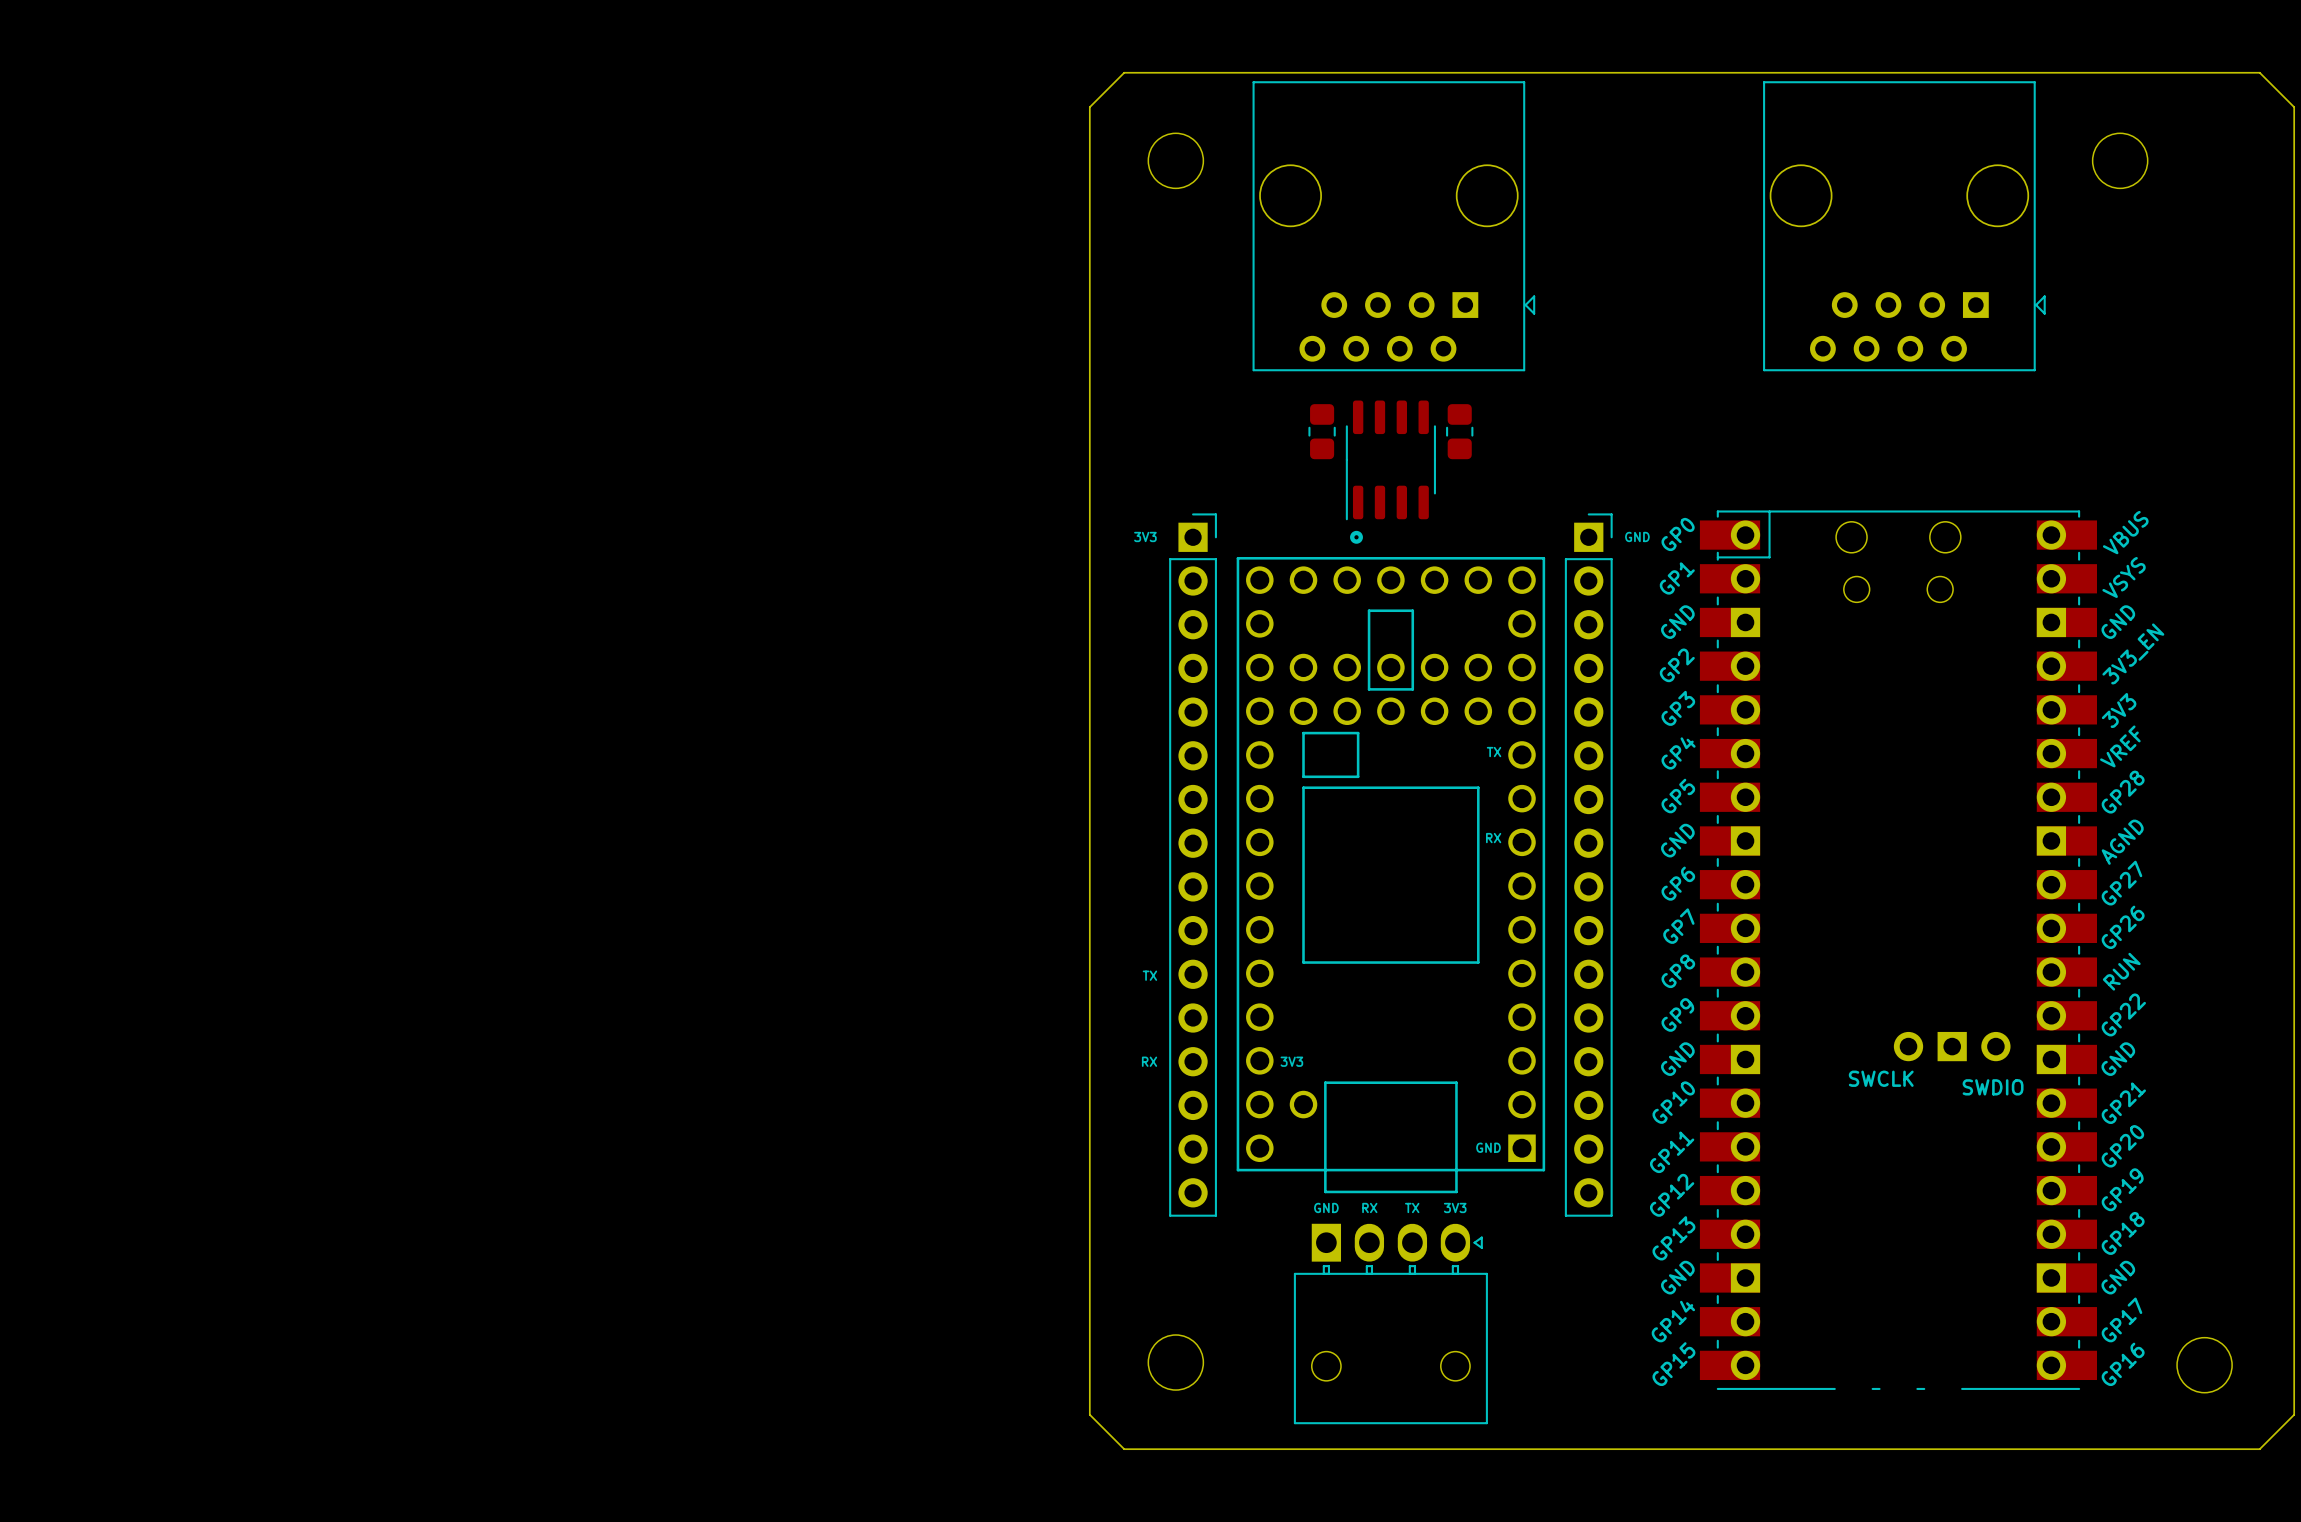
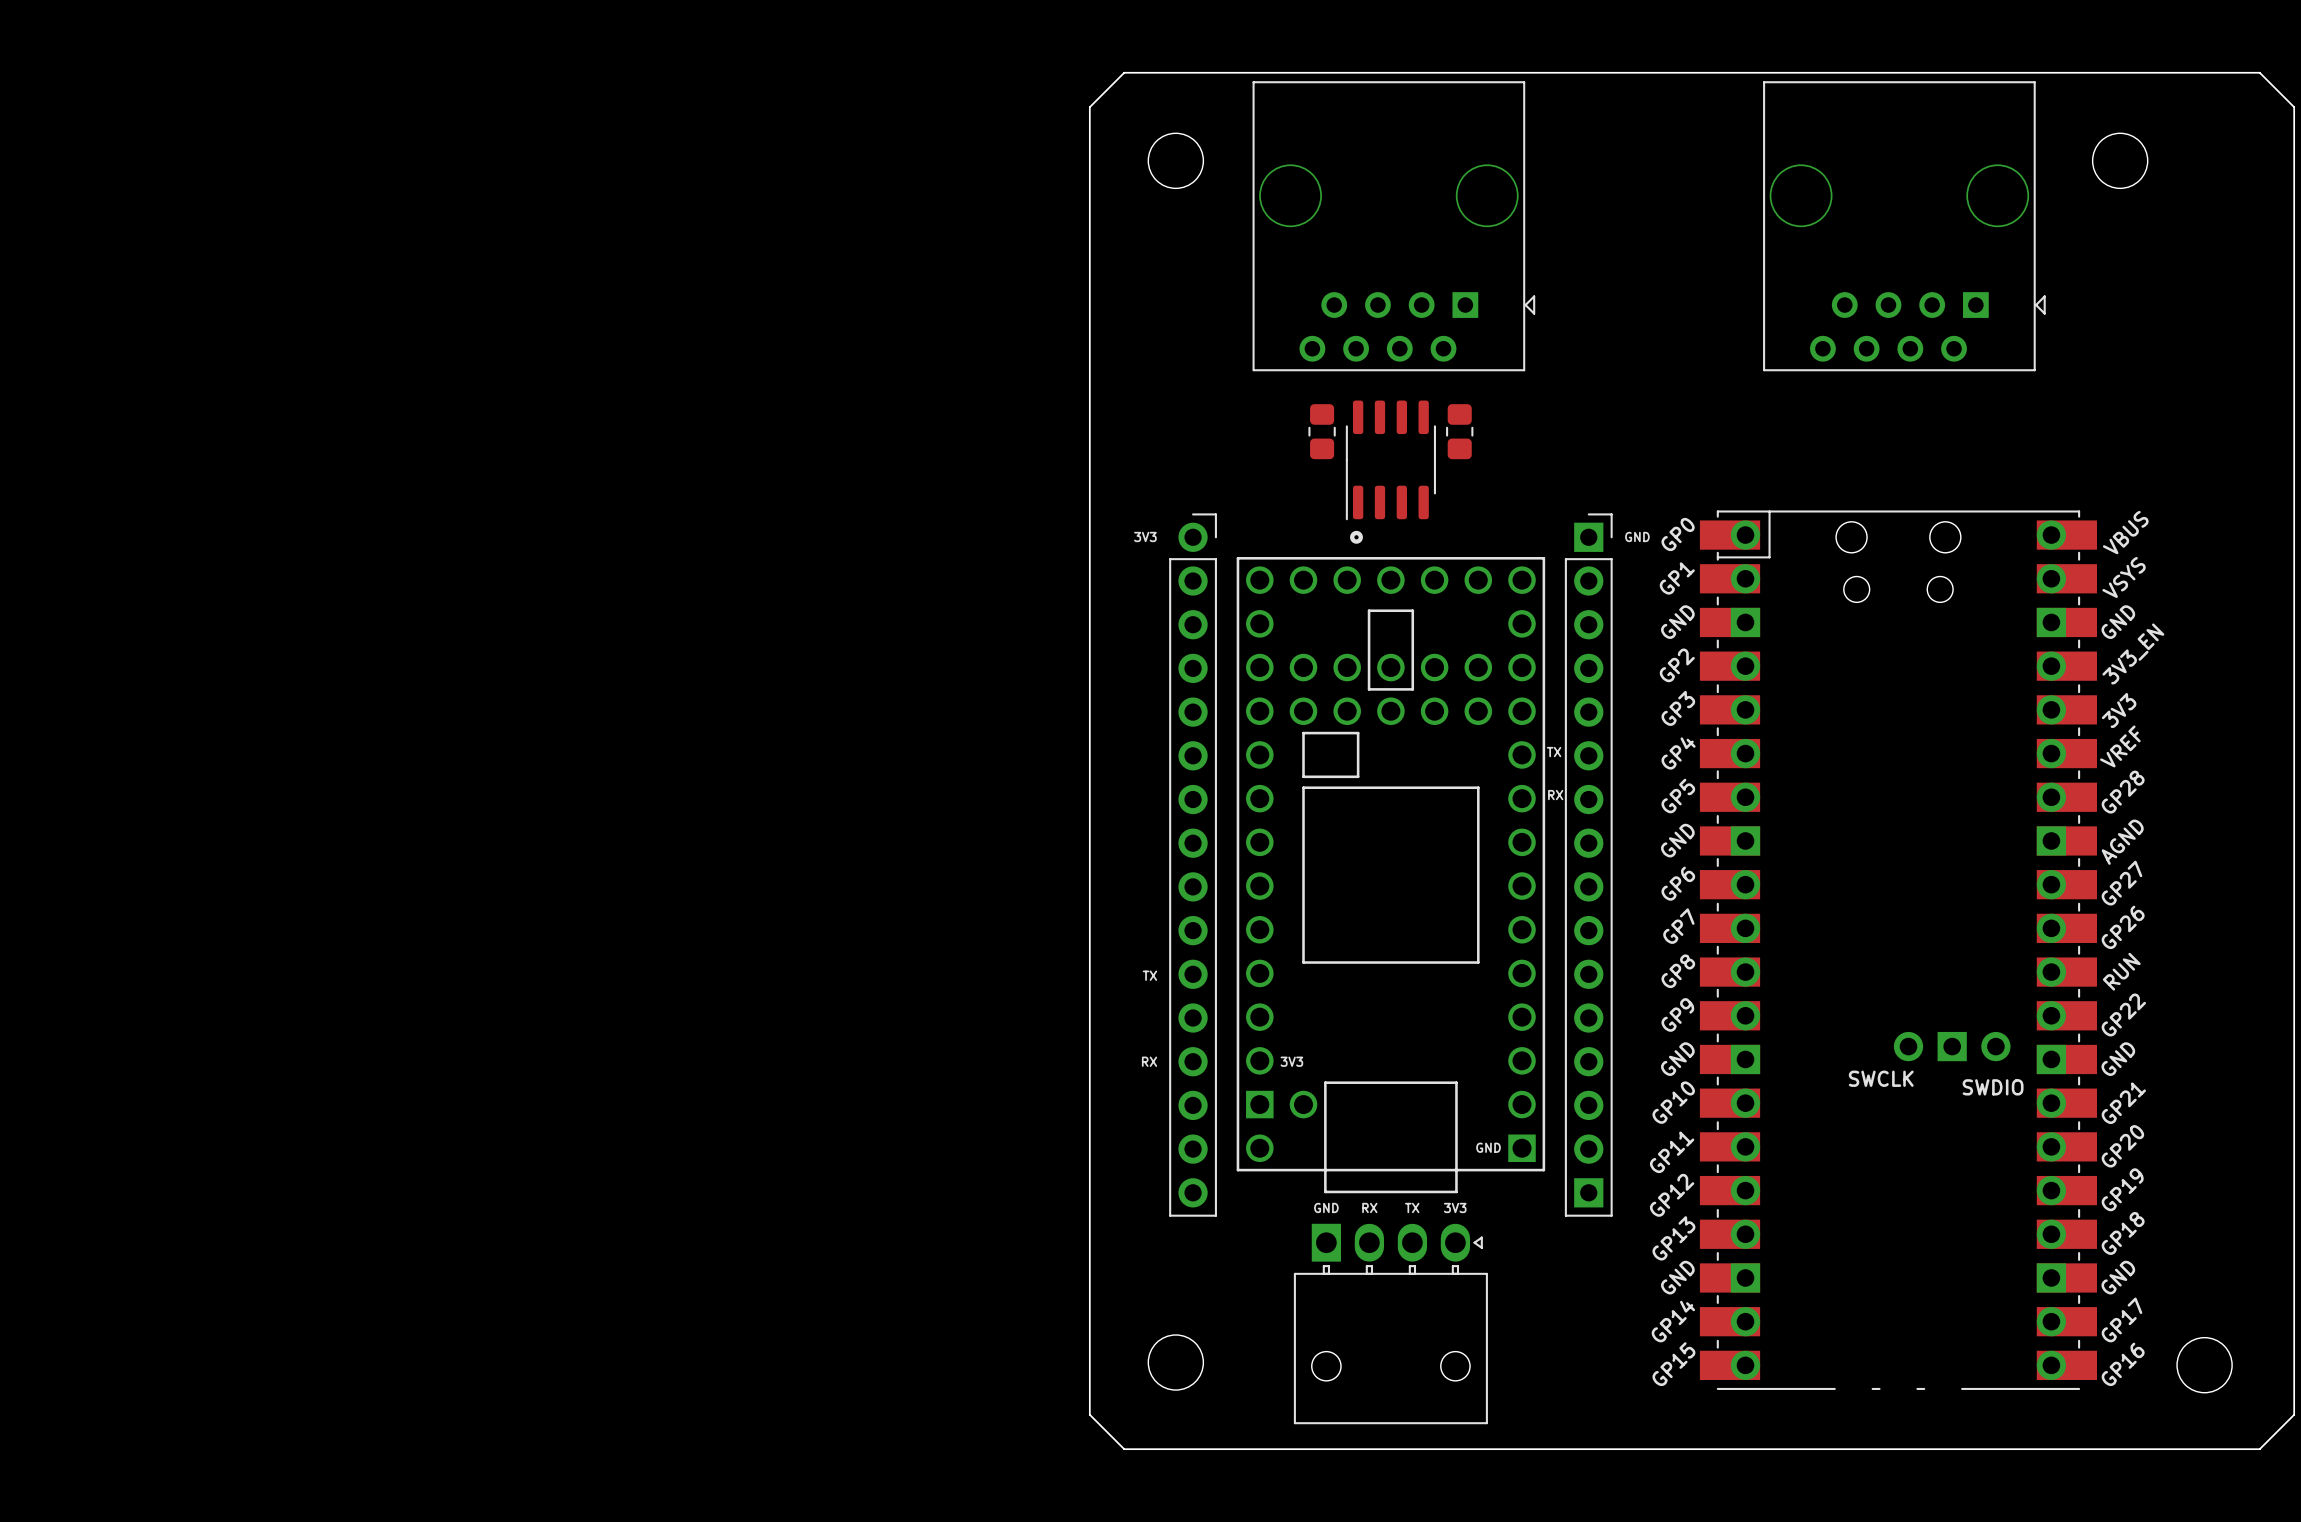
part footprint: [1169, 513, 1217, 1217] -> [1169, 513, 1217, 1217]
part footprint: [1564, 513, 1613, 1217] -> [1564, 513, 1613, 1217]
part footprint: [1236, 557, 1546, 1194] -> [1236, 557, 1546, 1194]
text position: TX (1494, 752) -> TX (1554, 752)
text position: RX (1493, 838) -> RX (1555, 795)

